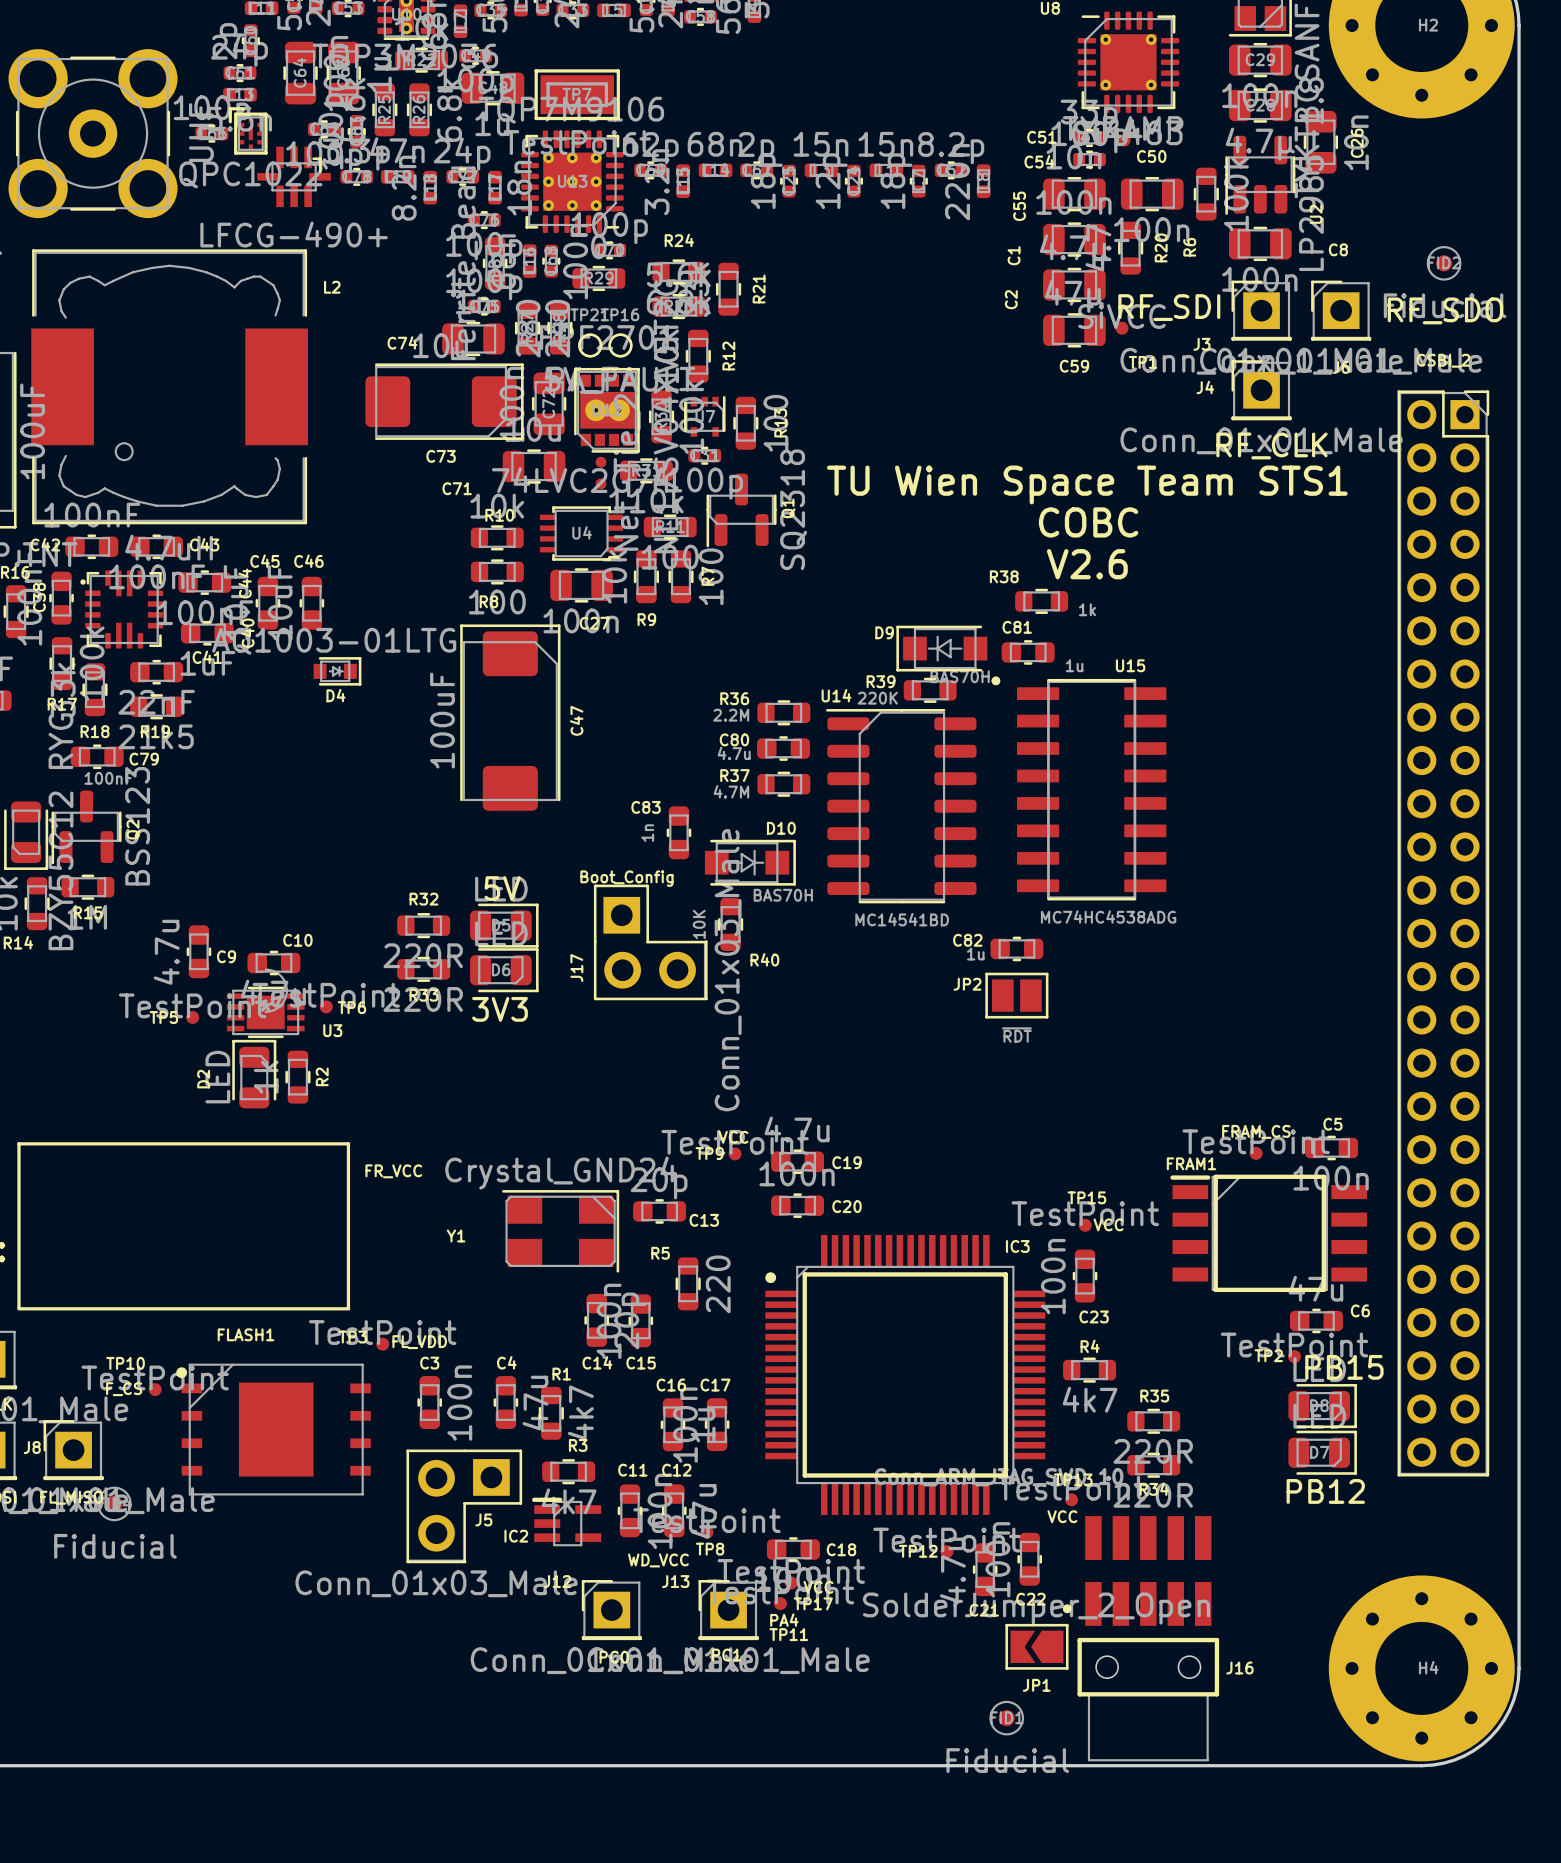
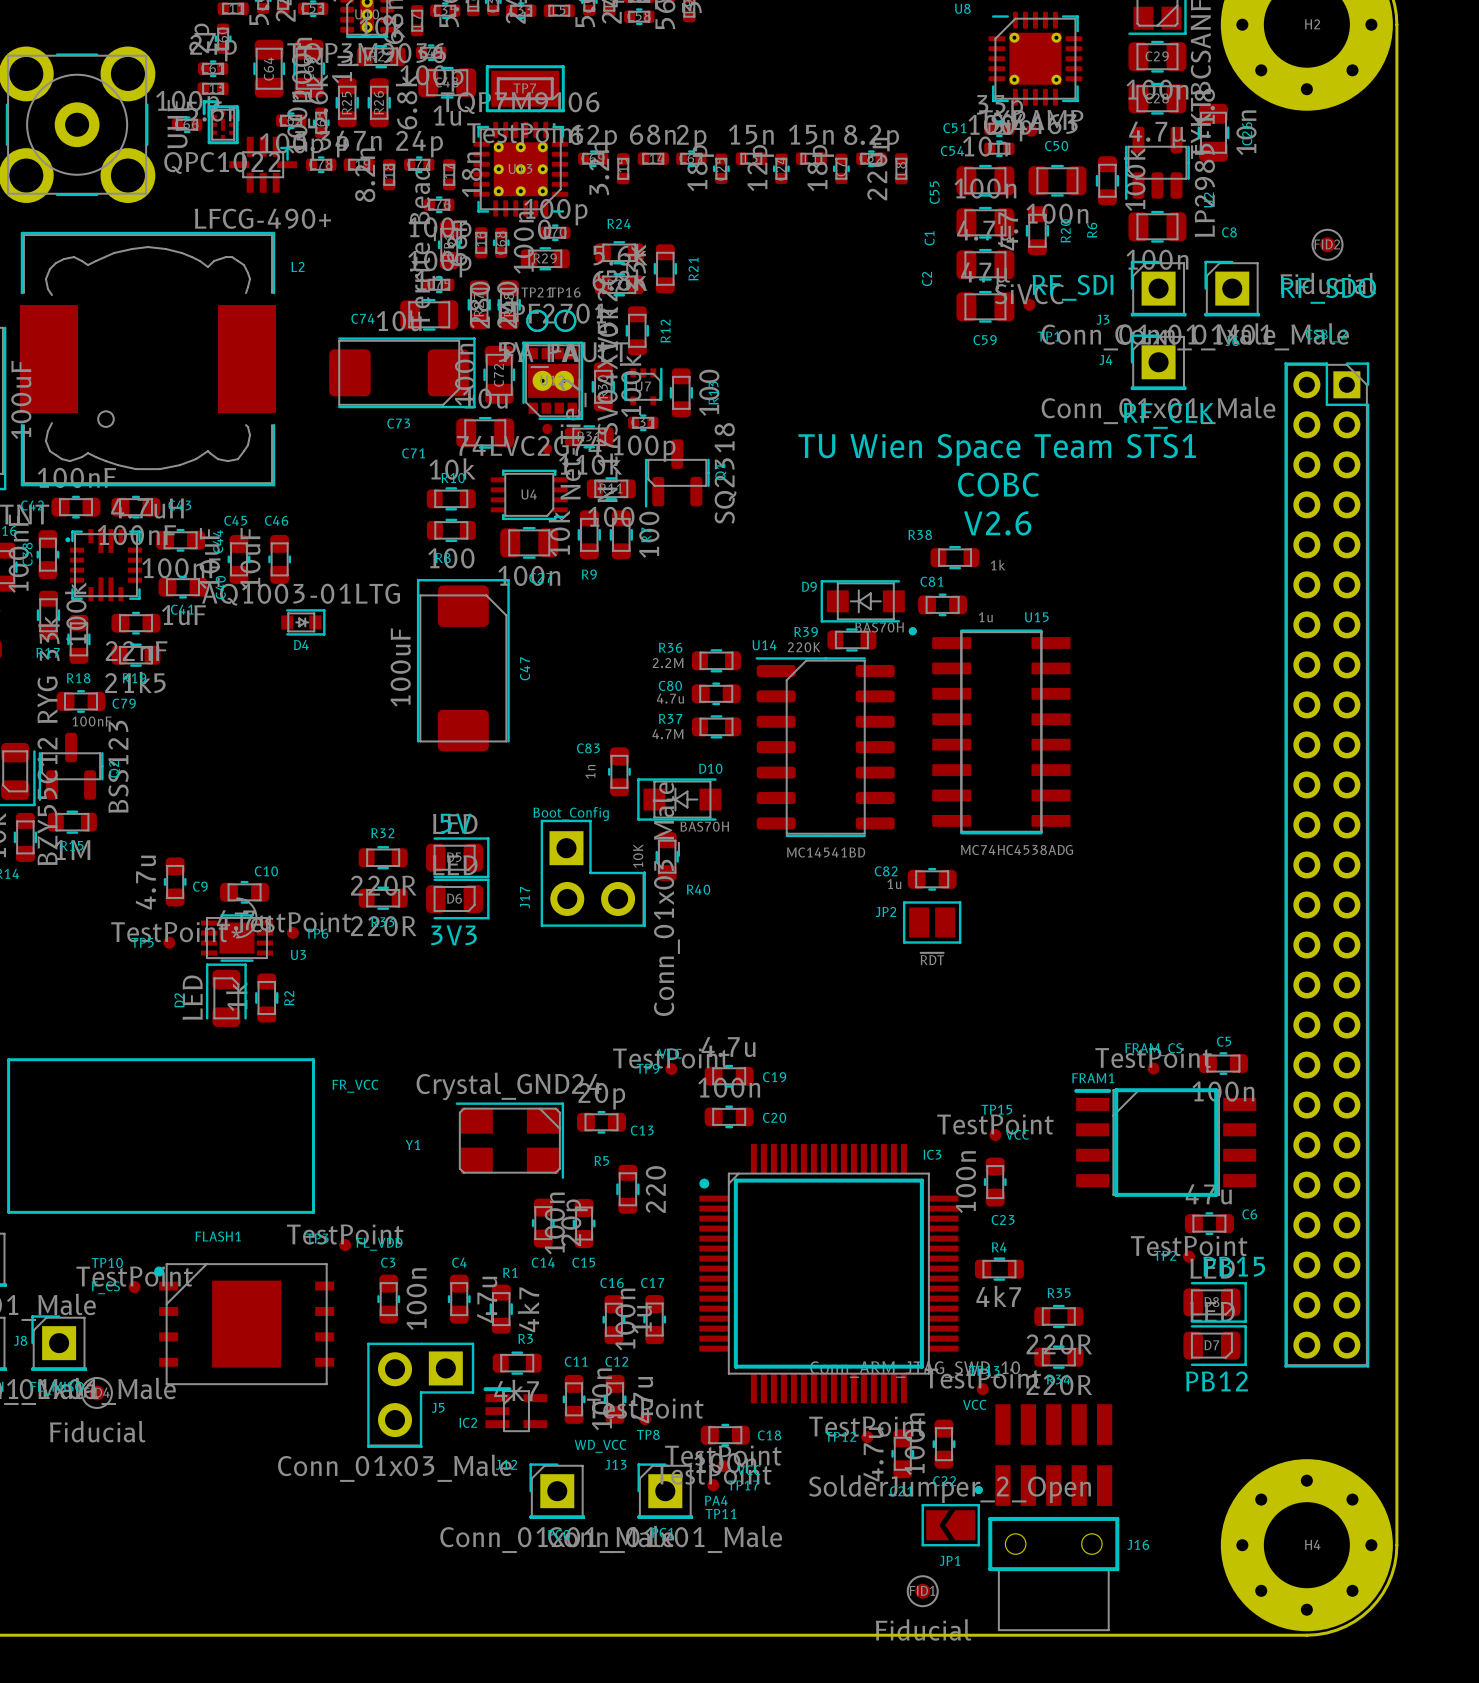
D10 rotation: 0° (750, 862) -> 180° (679, 799)

